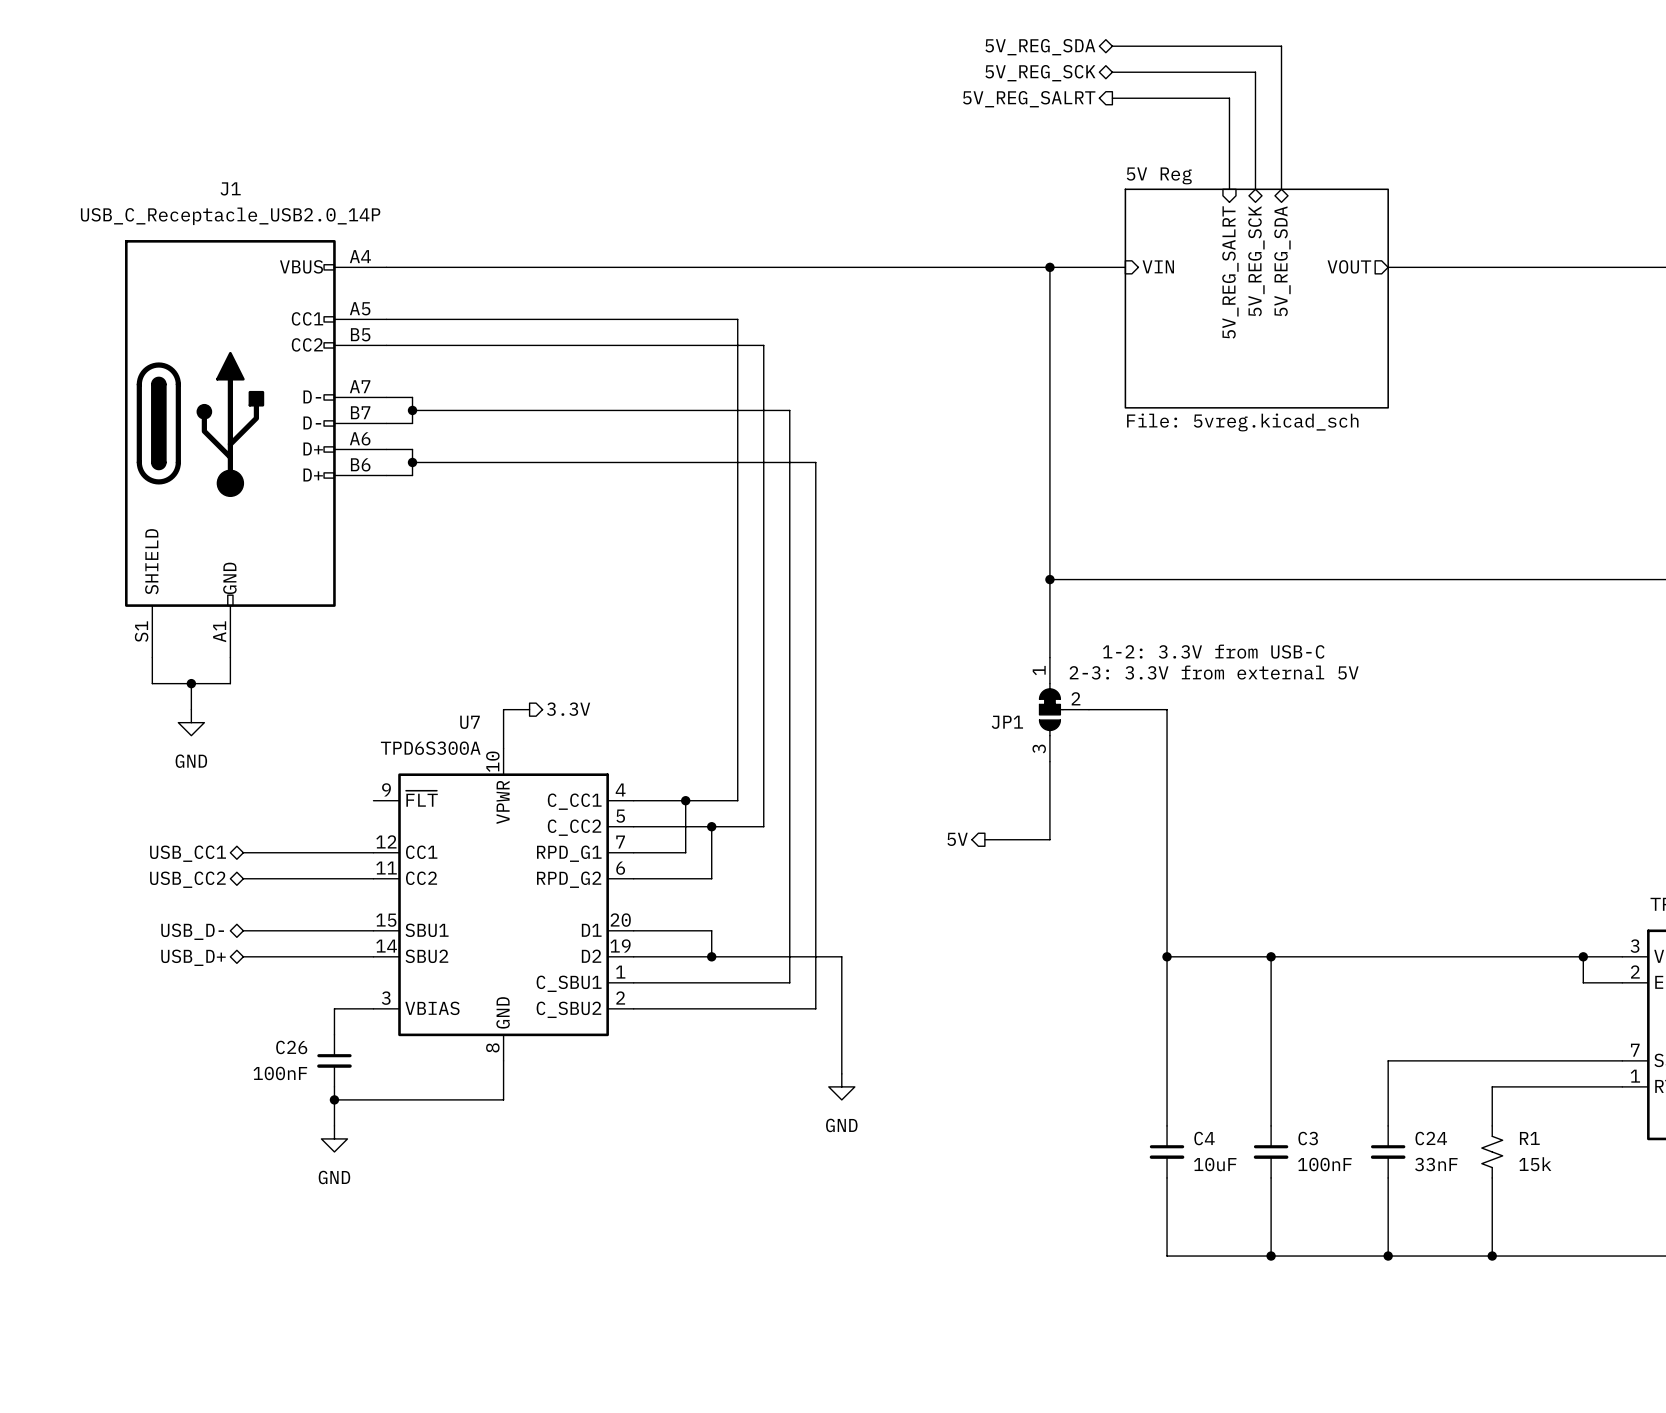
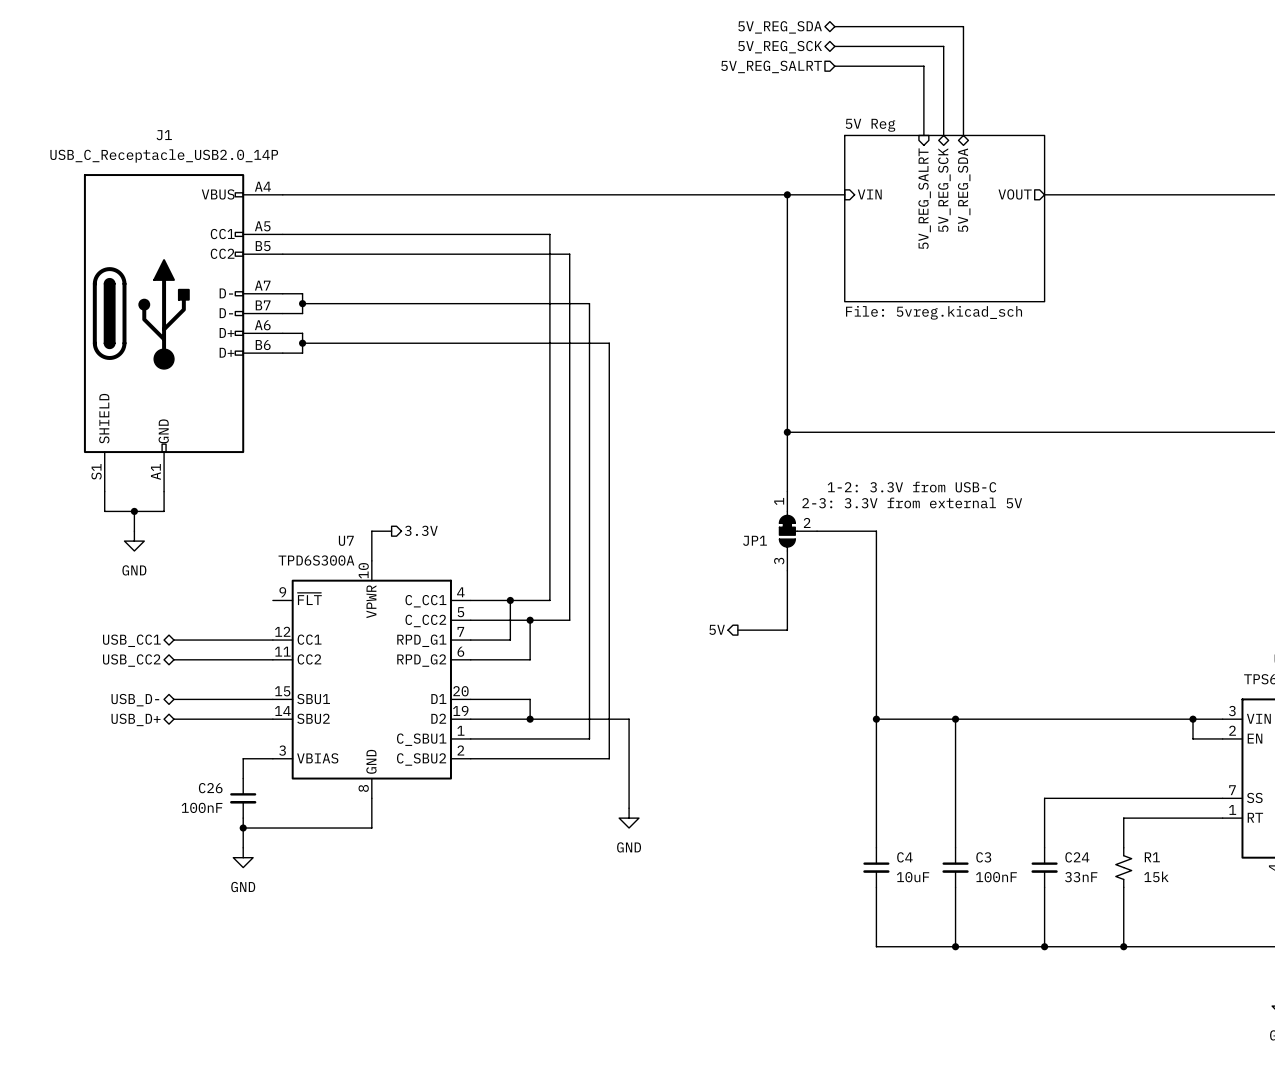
hierarchical label shape: output (1029, 99) -> input (771, 66)

